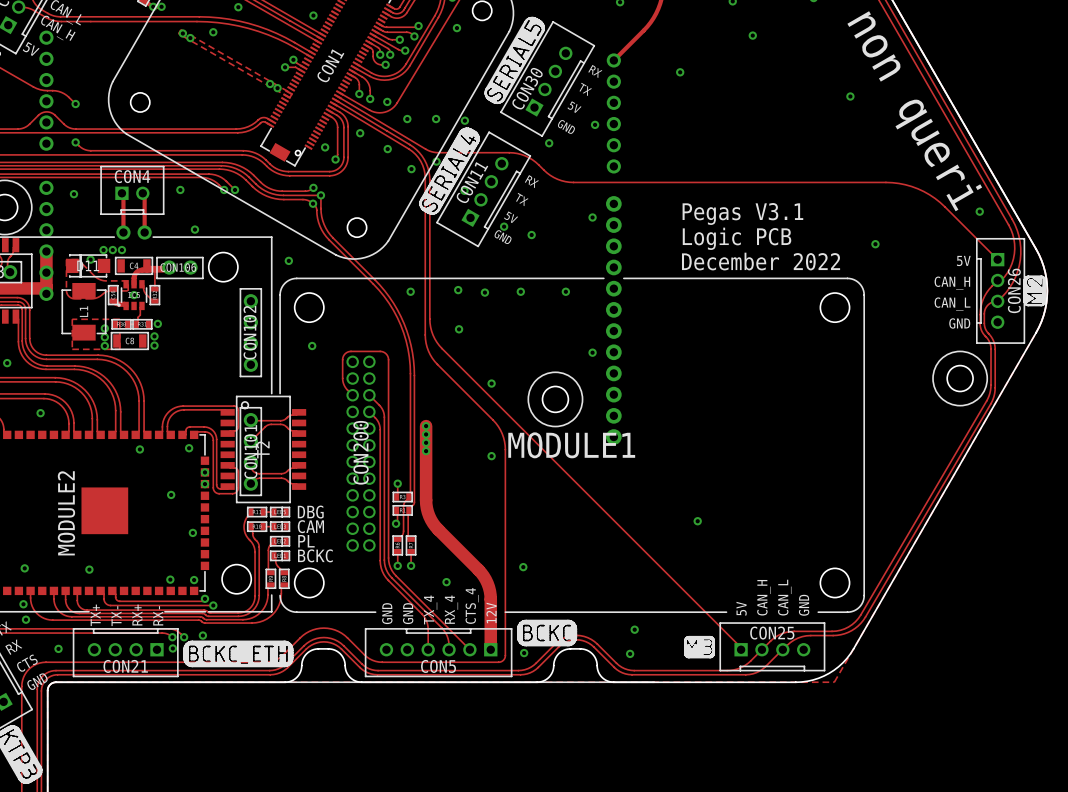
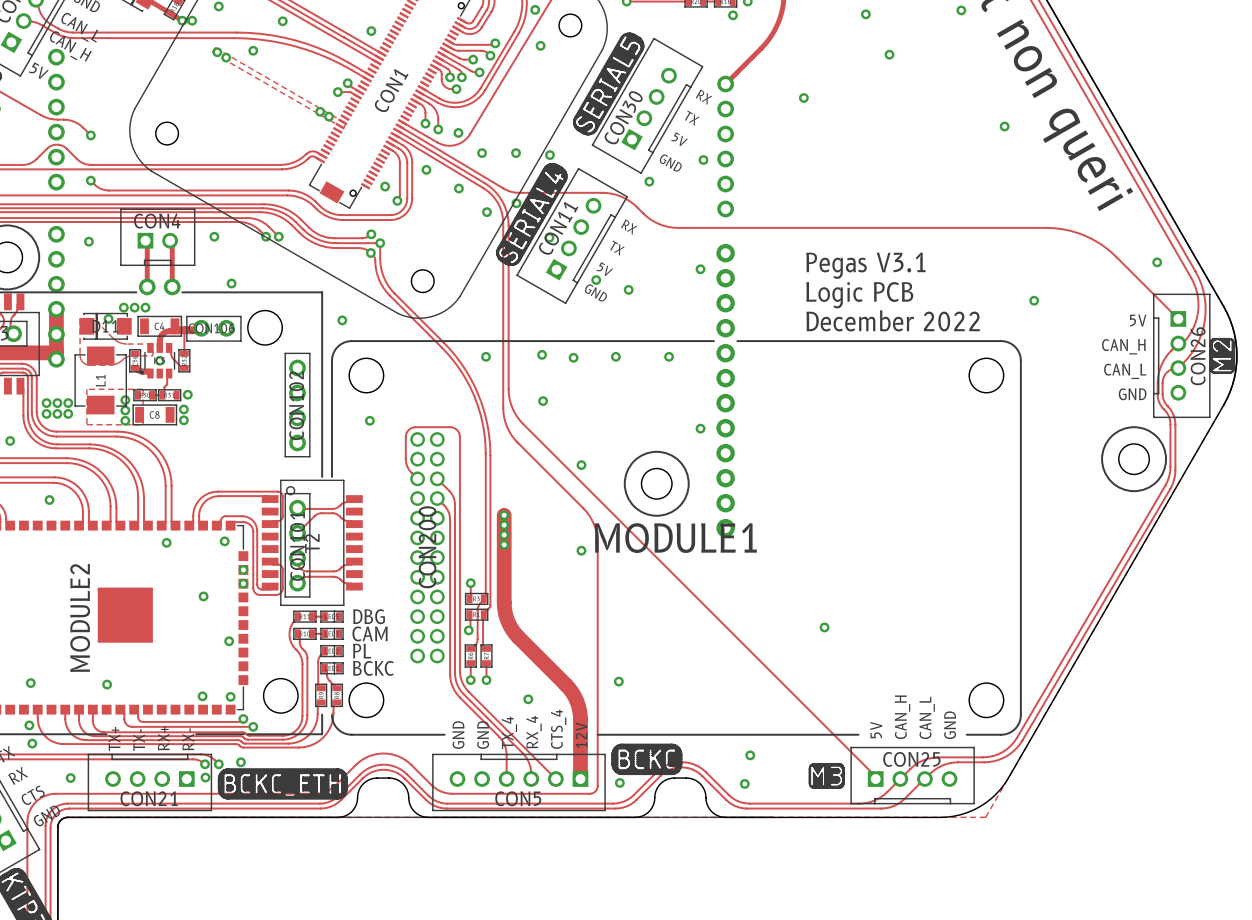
via: none -> (46, 403)
via: none -> (57, 403)
via: none -> (68, 403)
via: none -> (46, 413)
via: none -> (57, 413)
via: none -> (68, 413)

